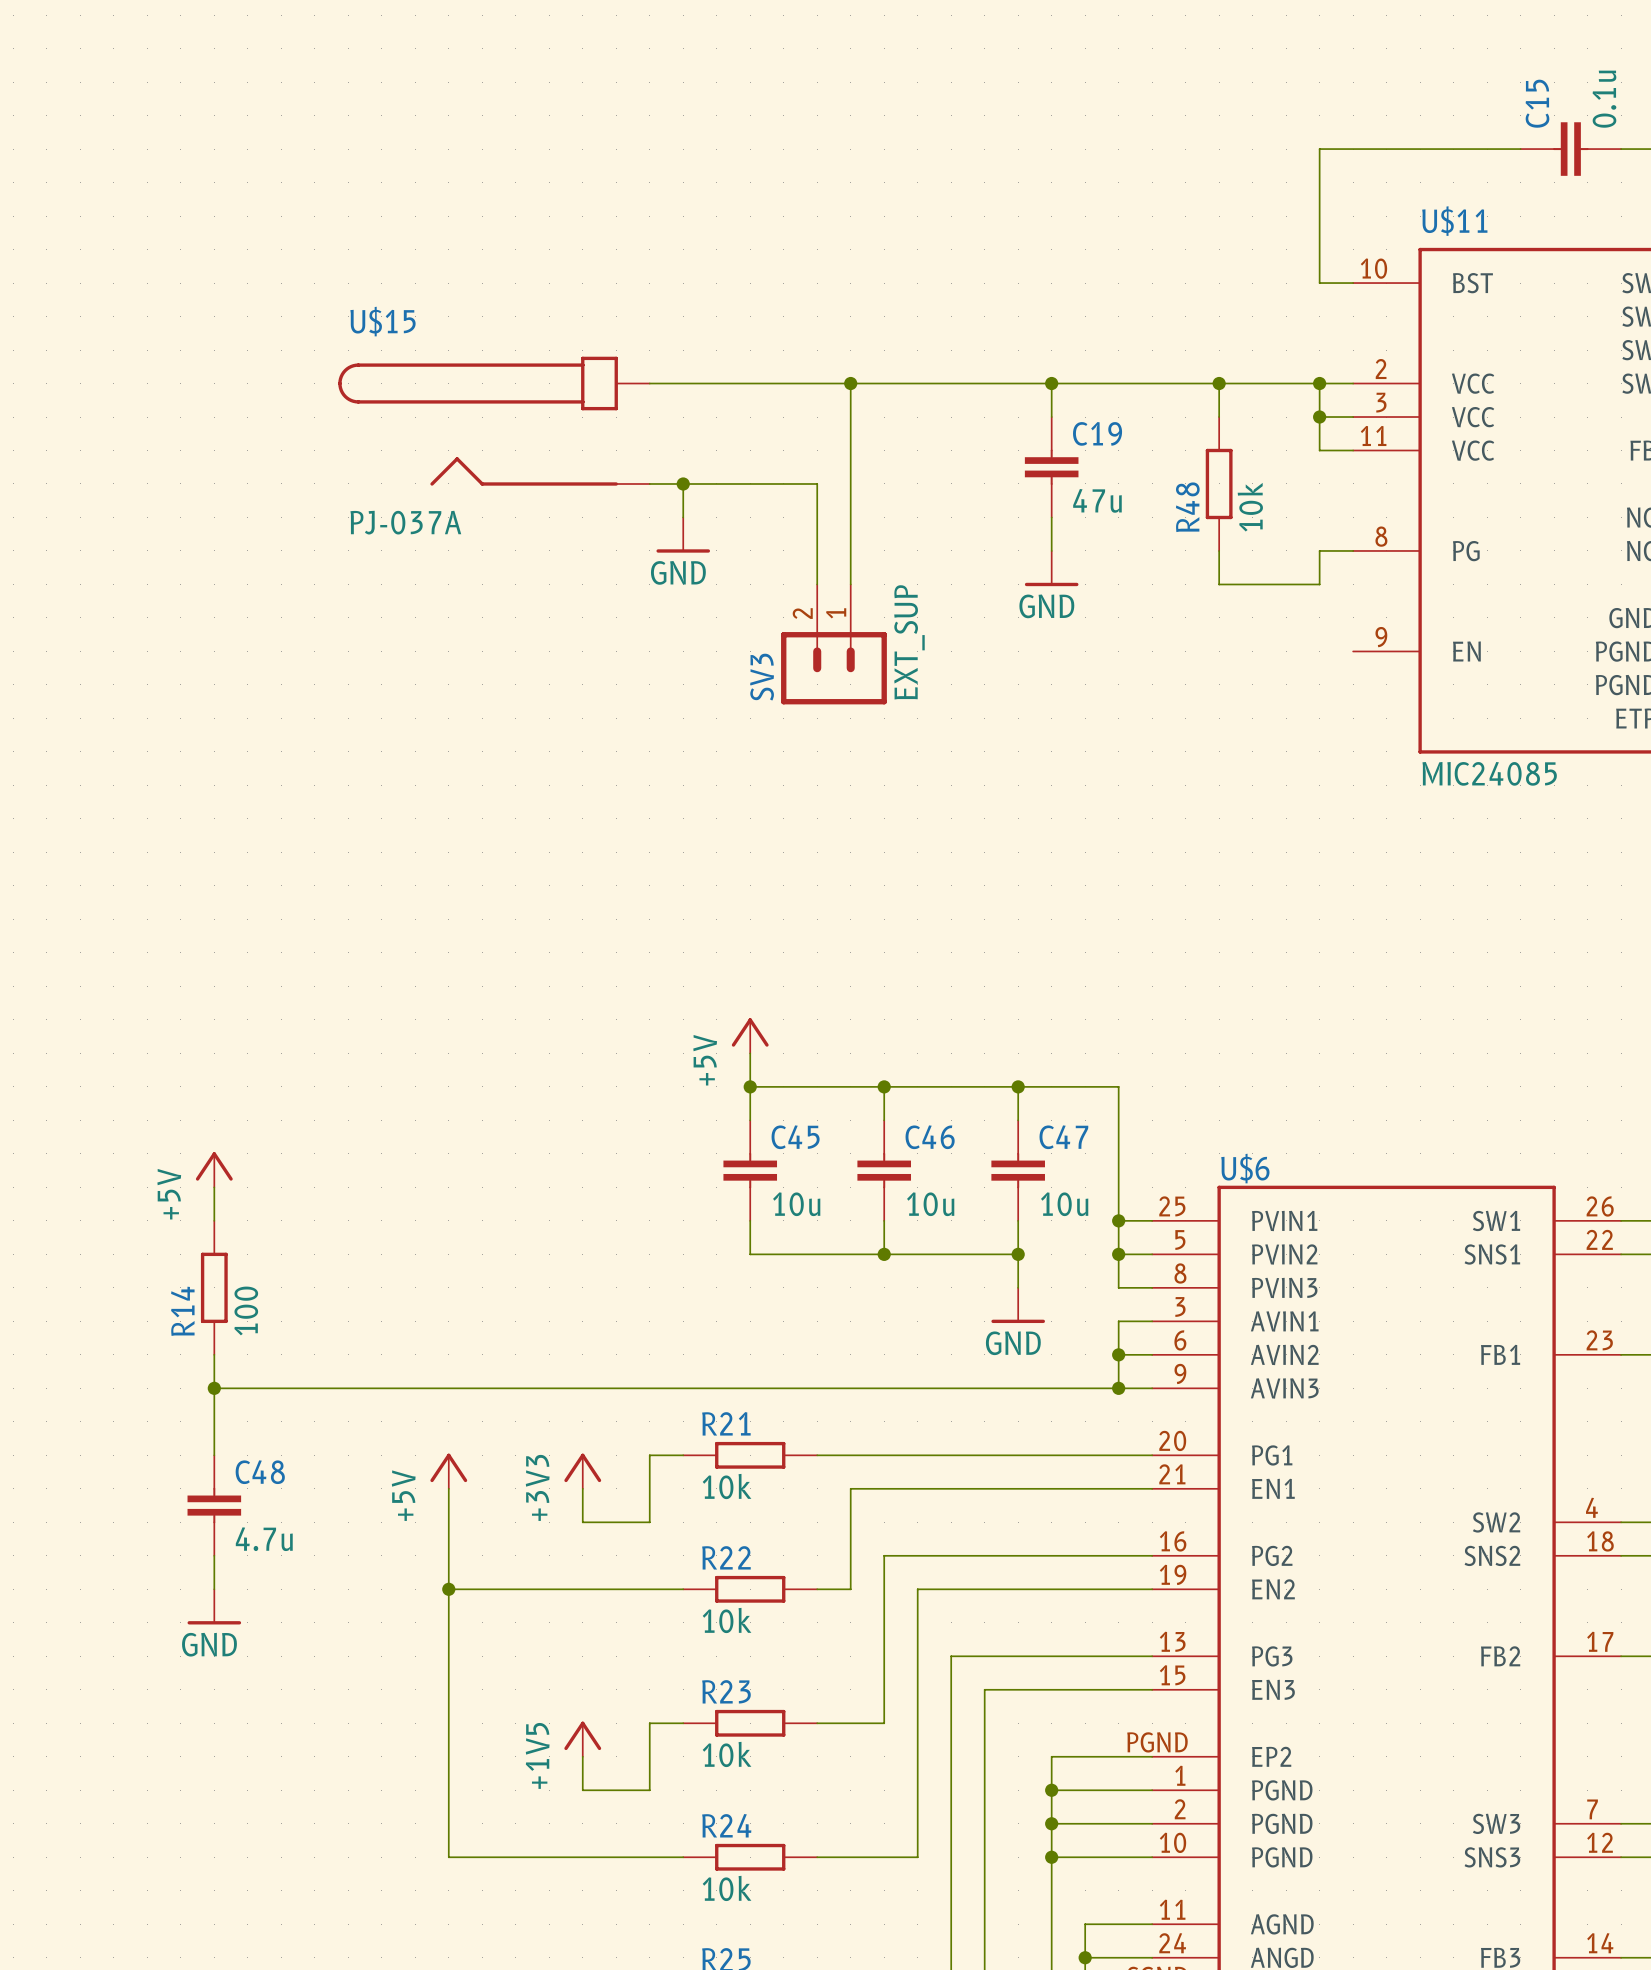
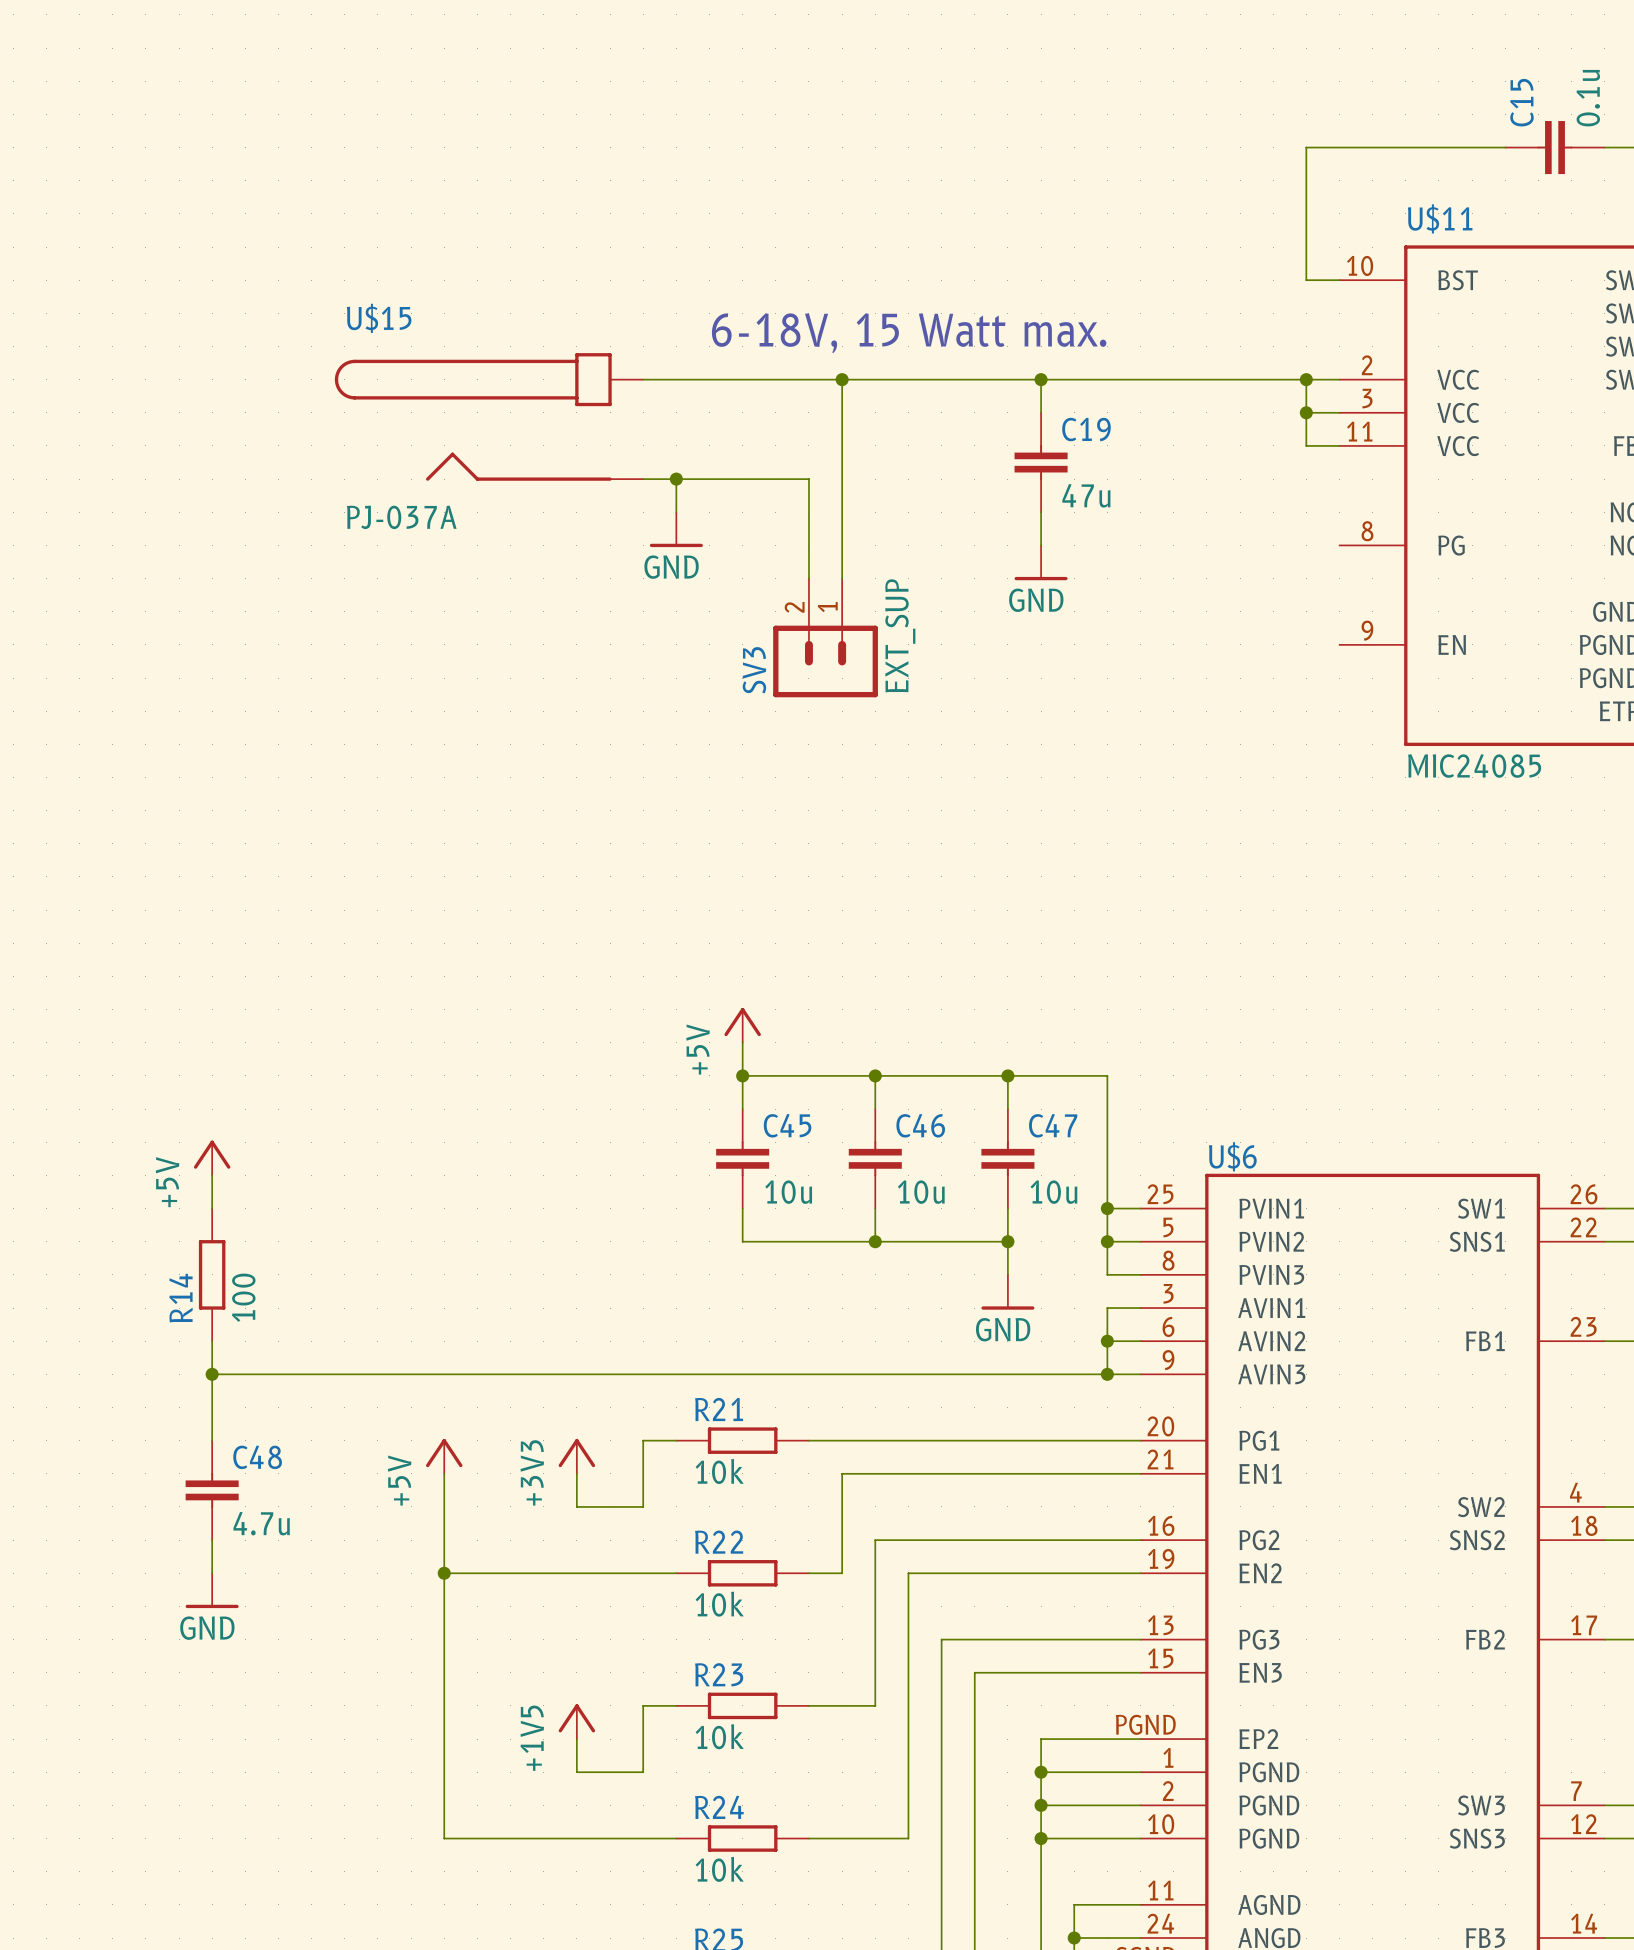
text: none -> 6-18V, 15 Watt max. (909, 333)
wire: (1219, 383) (1219, 417) -> none
junction: (1219, 383) -> none
R48: 10k (1219, 483) -> none
wire: (1219, 550) (1219, 584) (1319, 584) (1319, 550) (1353, 550) -> none

